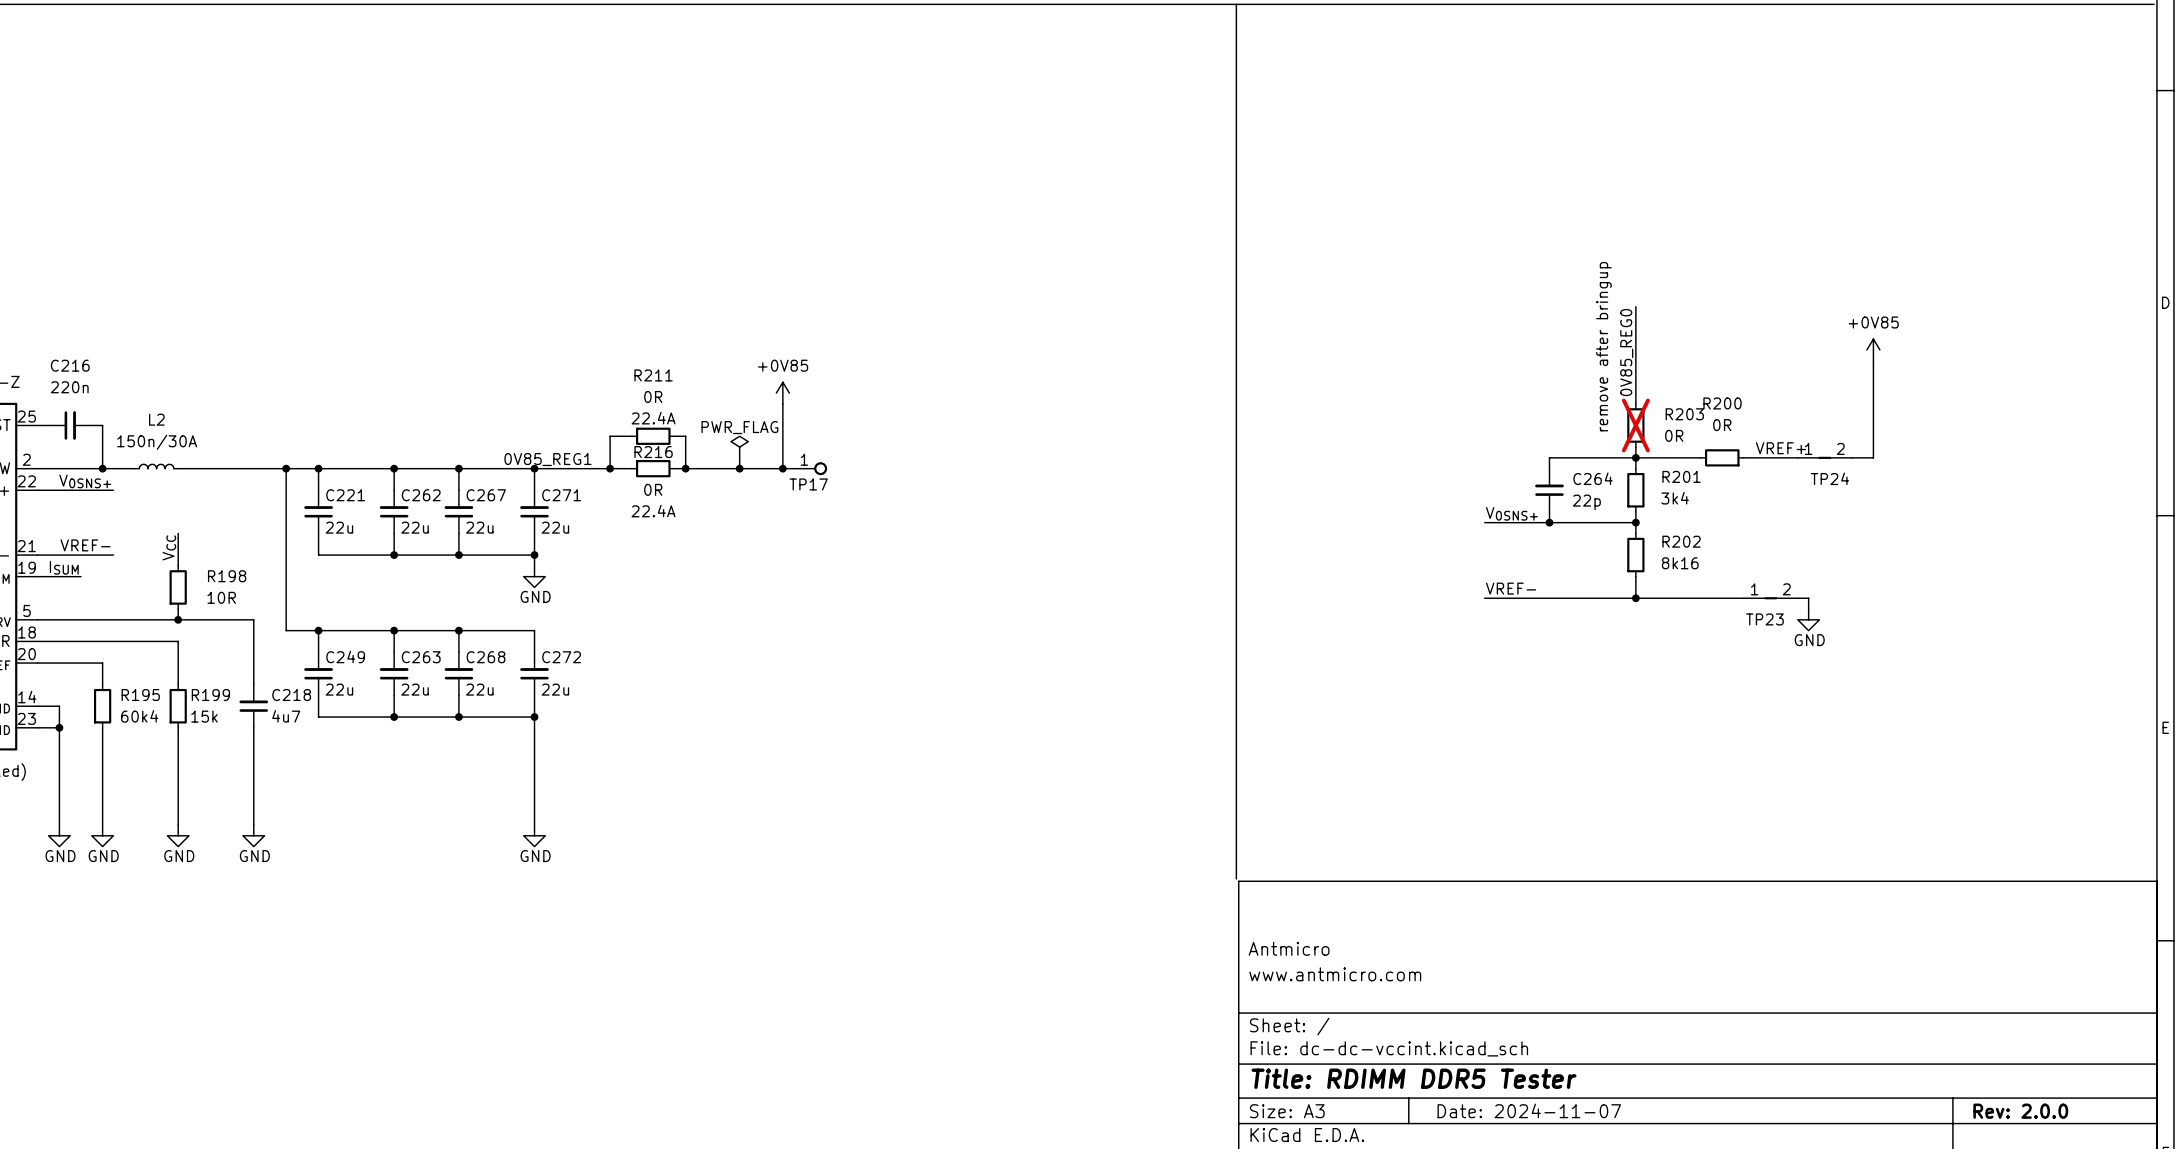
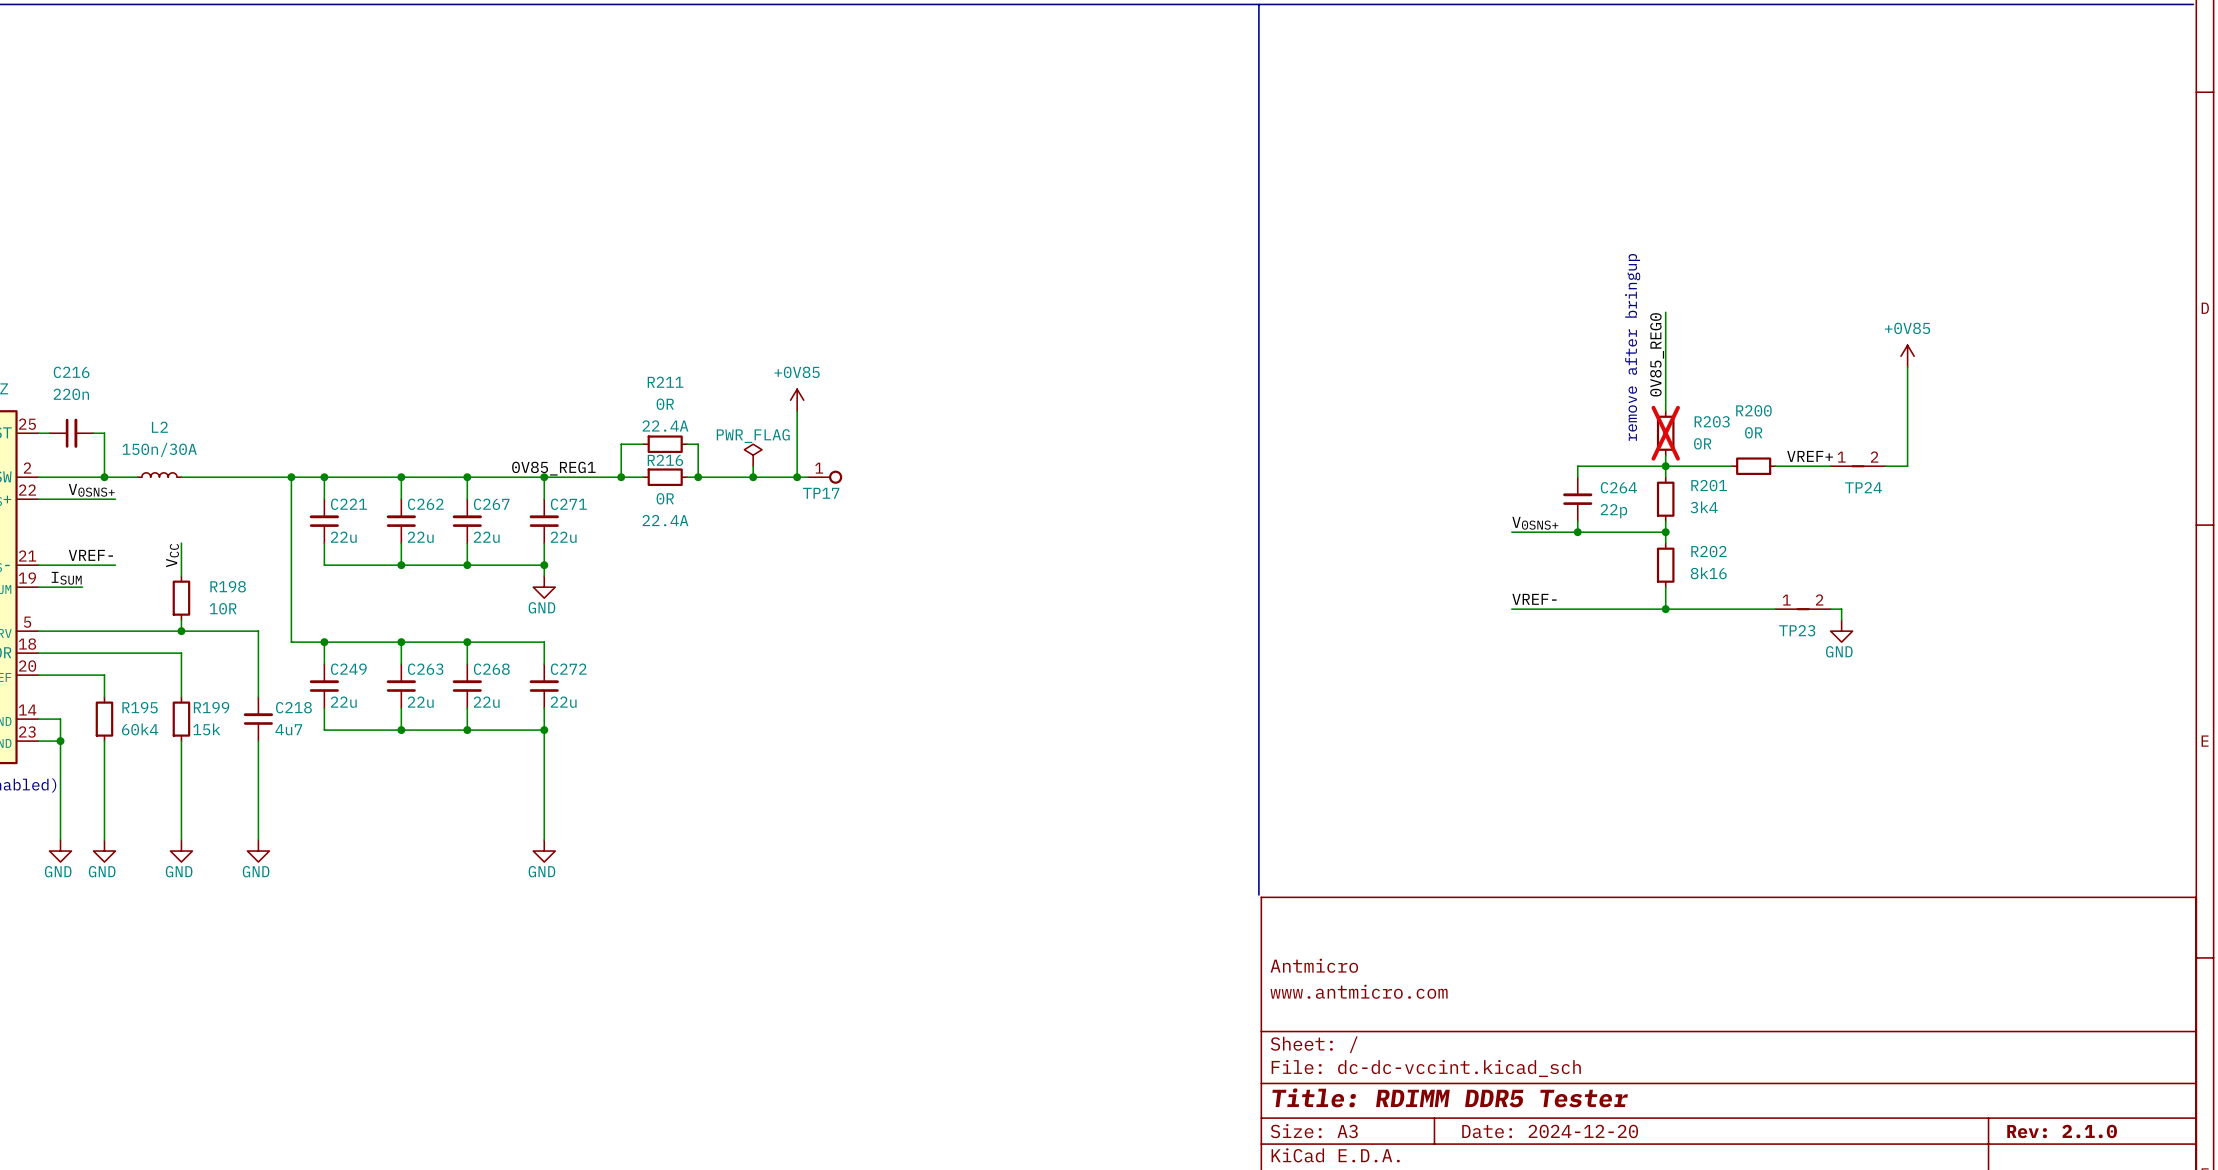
title block: Date: 2024-11-07 (1529, 1110) -> Date: 2024-12-20 (1550, 1131)
title block: Rev: 2.0.0 (2020, 1111) -> Rev: 2.1.0 (2062, 1131)

